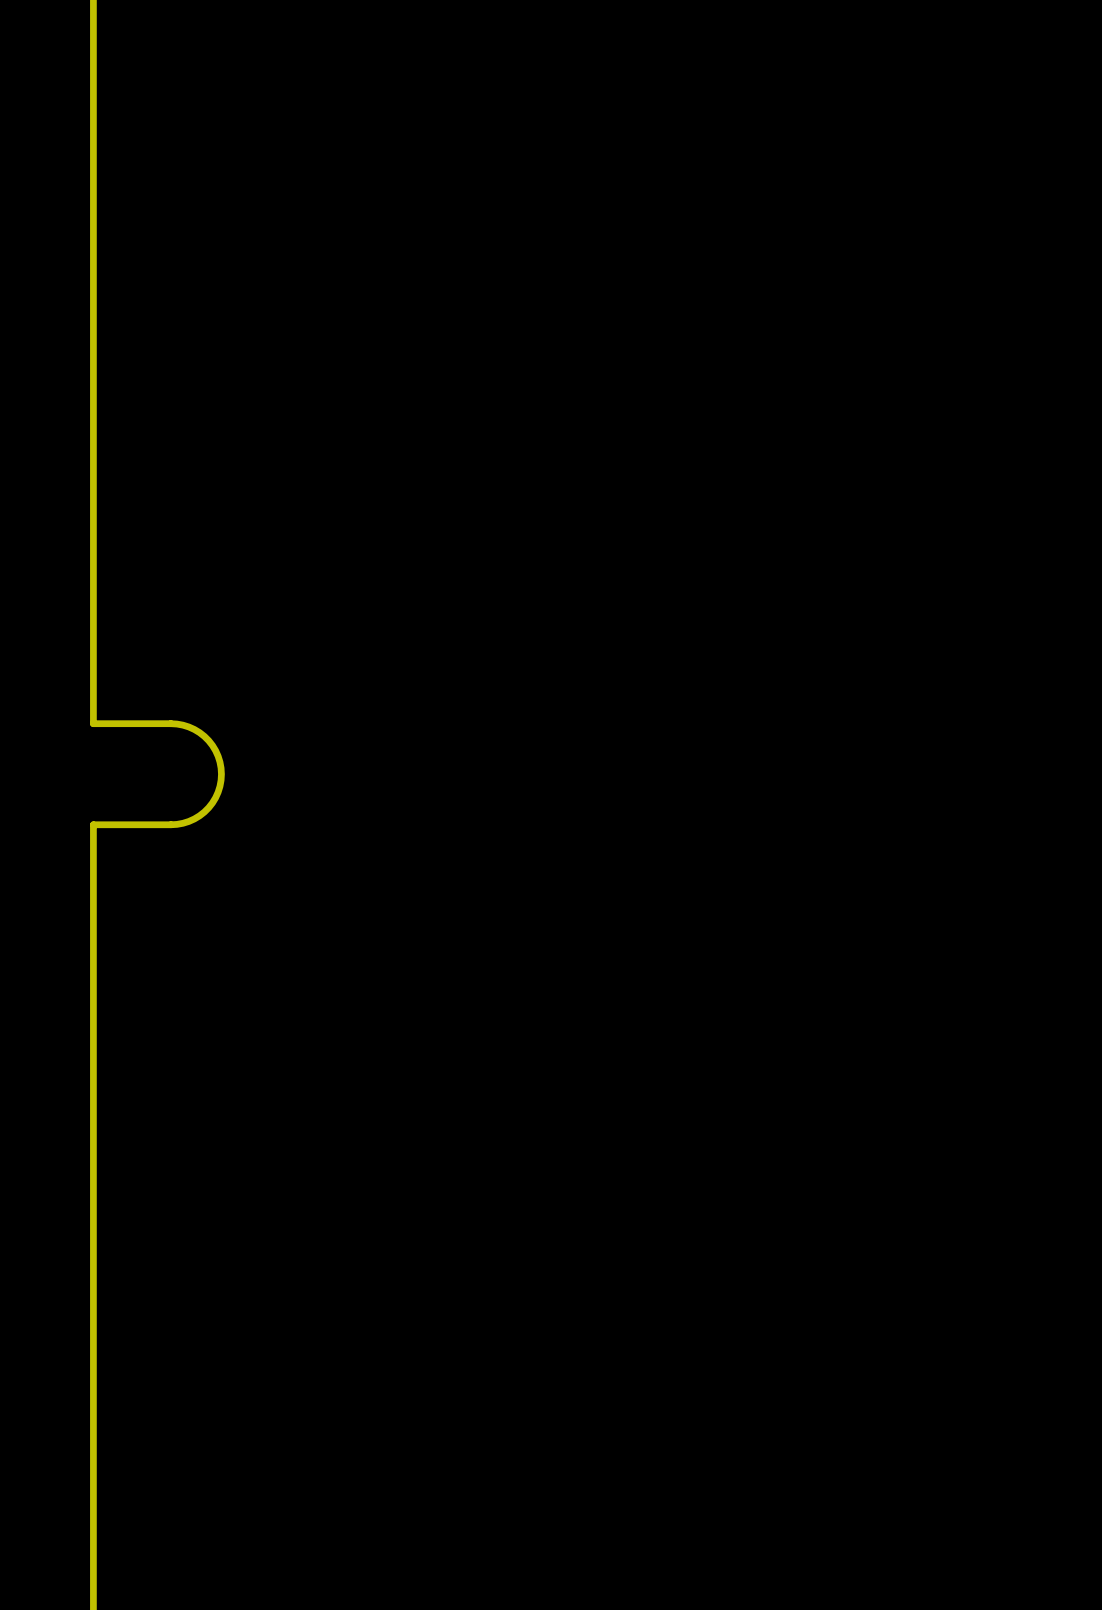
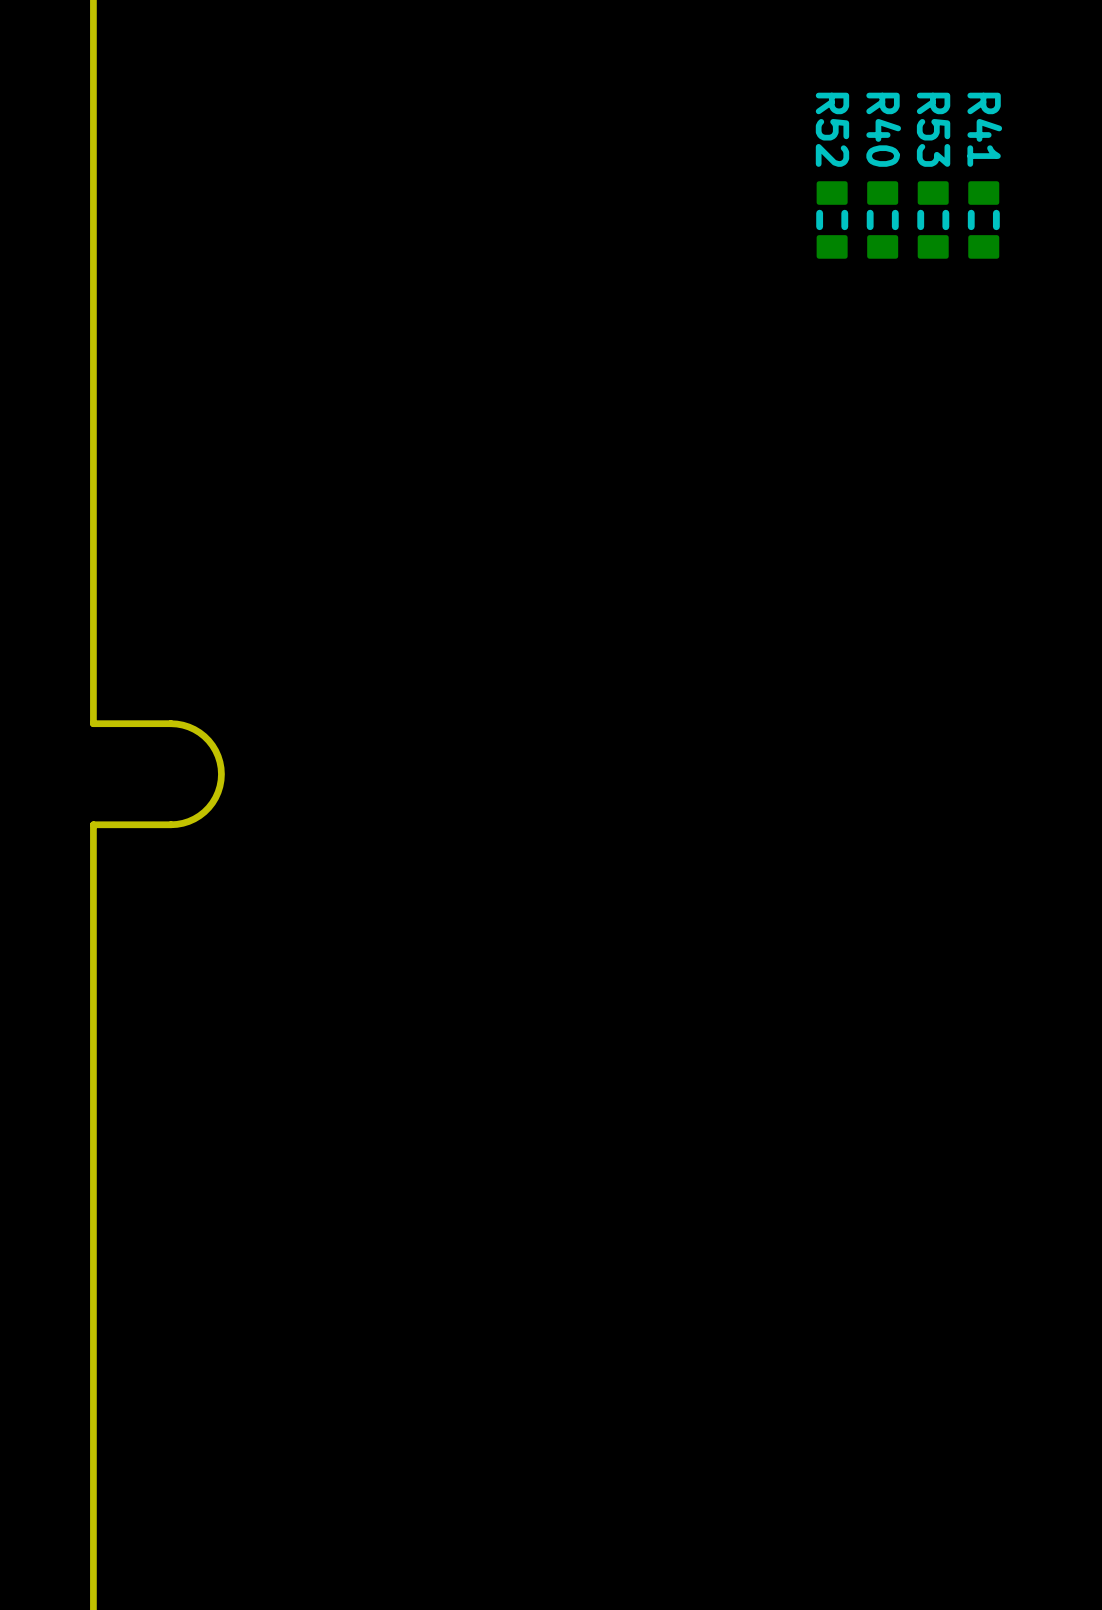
R52: none -> (832, 219)
R40: none -> (882, 219)
R53: none -> (933, 219)
R41: none -> (983, 219)

